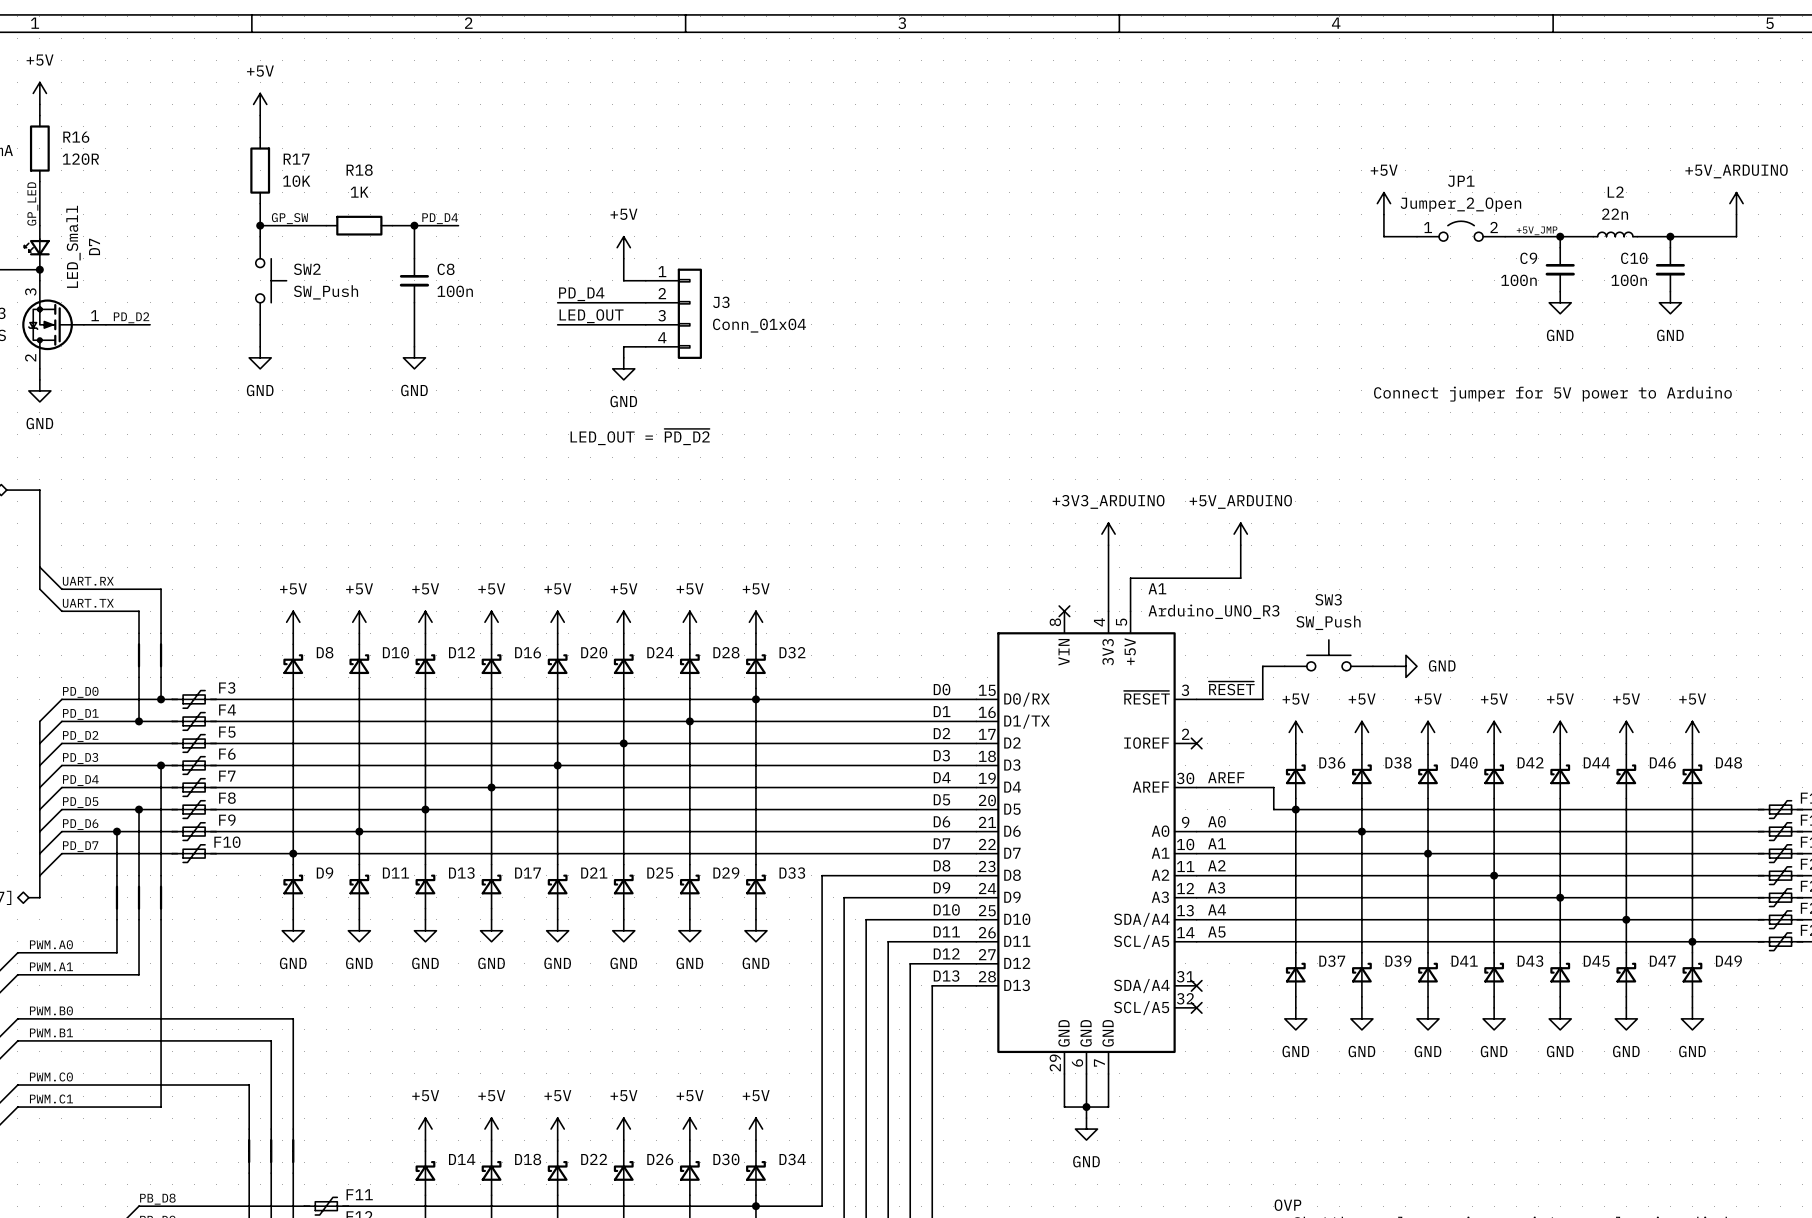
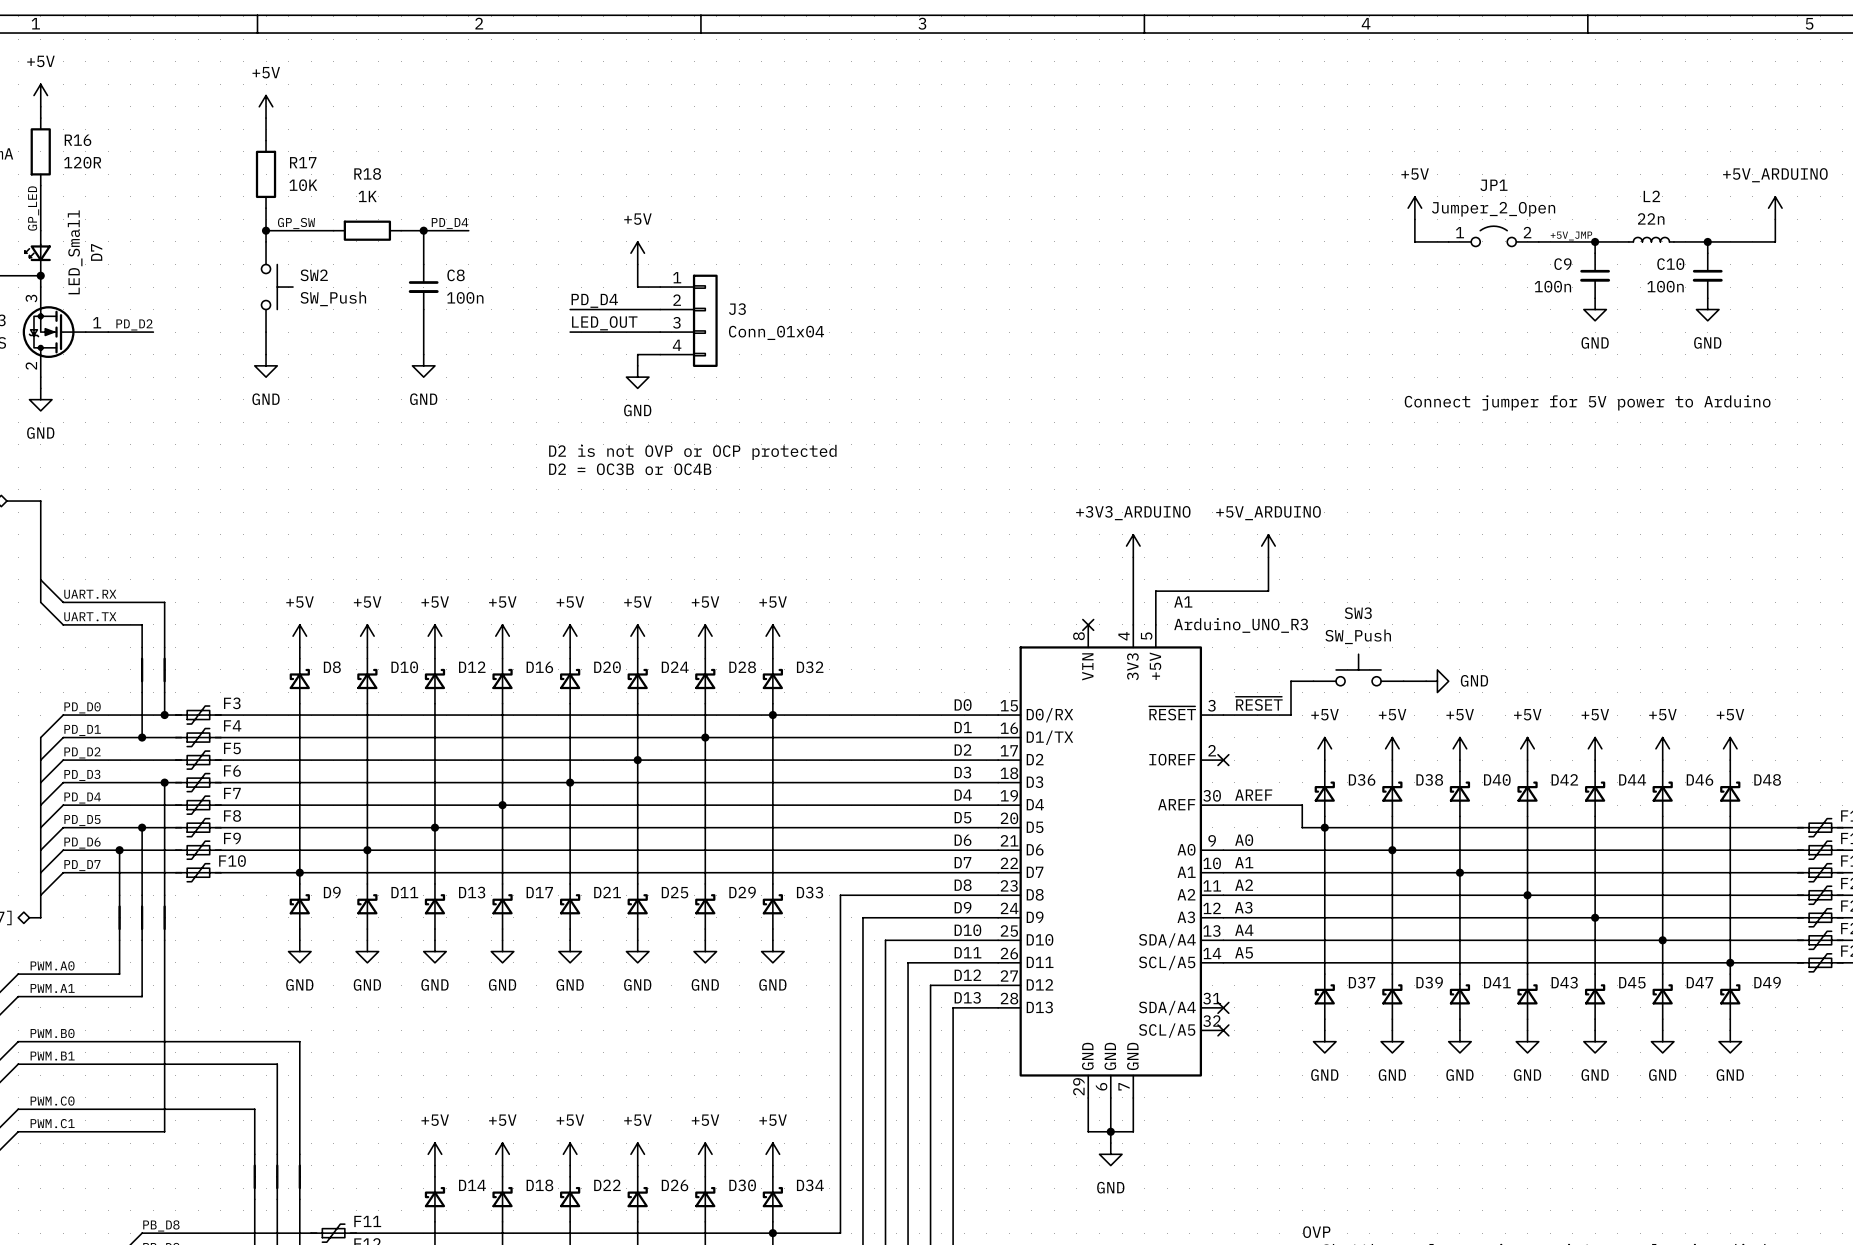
text: LED_OUT = ~{PD_D2} (640, 437) -> none
text: none -> D2 is not OVP or OCP protected (692, 452)
text: none -> D2 = OC3B or OC4B (630, 469)

